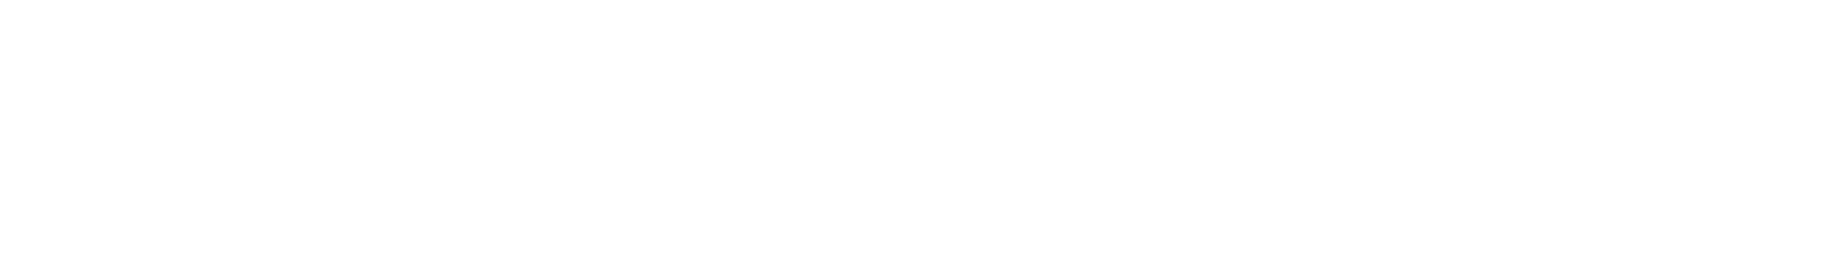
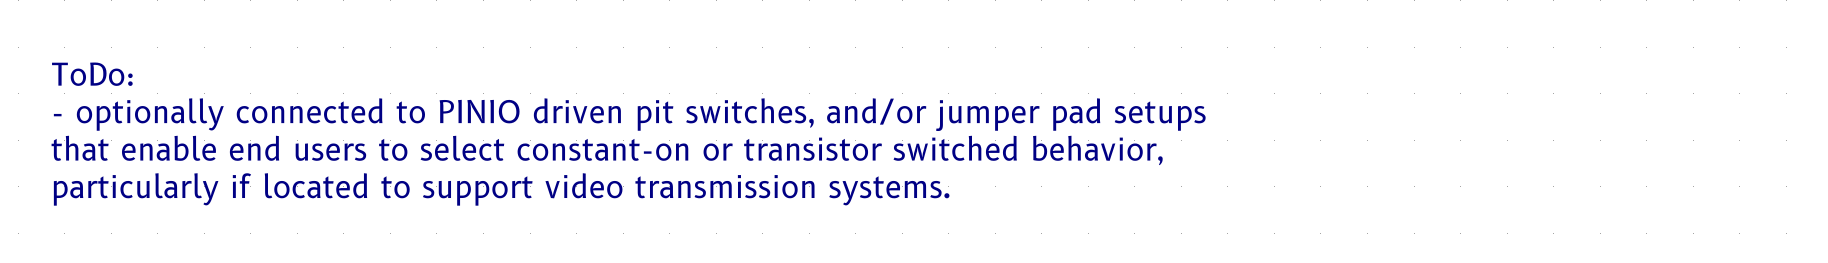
text: none -> ToDo: (92, 74)
text: none -> - optionally connected to PINIO driven pit switches, and/or jumper pad setups (629, 114)
text: none -> that enable end users to select constant-on or transistor switched behavior, (607, 150)
text: none -> particularly if located to support video transmission systems. (501, 189)

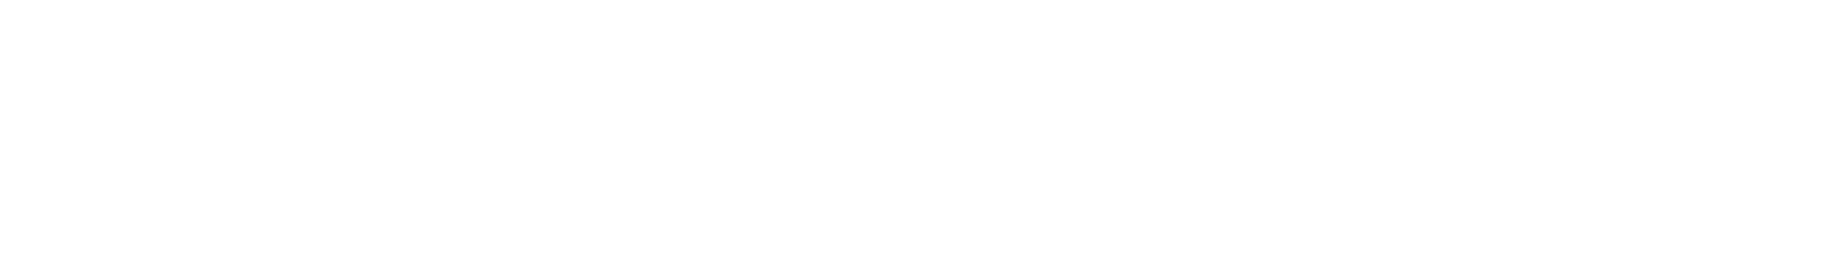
text: ToDo: (92, 74) -> none
text: - optionally connected to PINIO driven pit switches, and/or jumper pad setups (629, 114) -> none
text: that enable end users to select constant-on or transistor switched behavior, (607, 150) -> none
text: particularly if located to support video transmission systems. (501, 189) -> none

